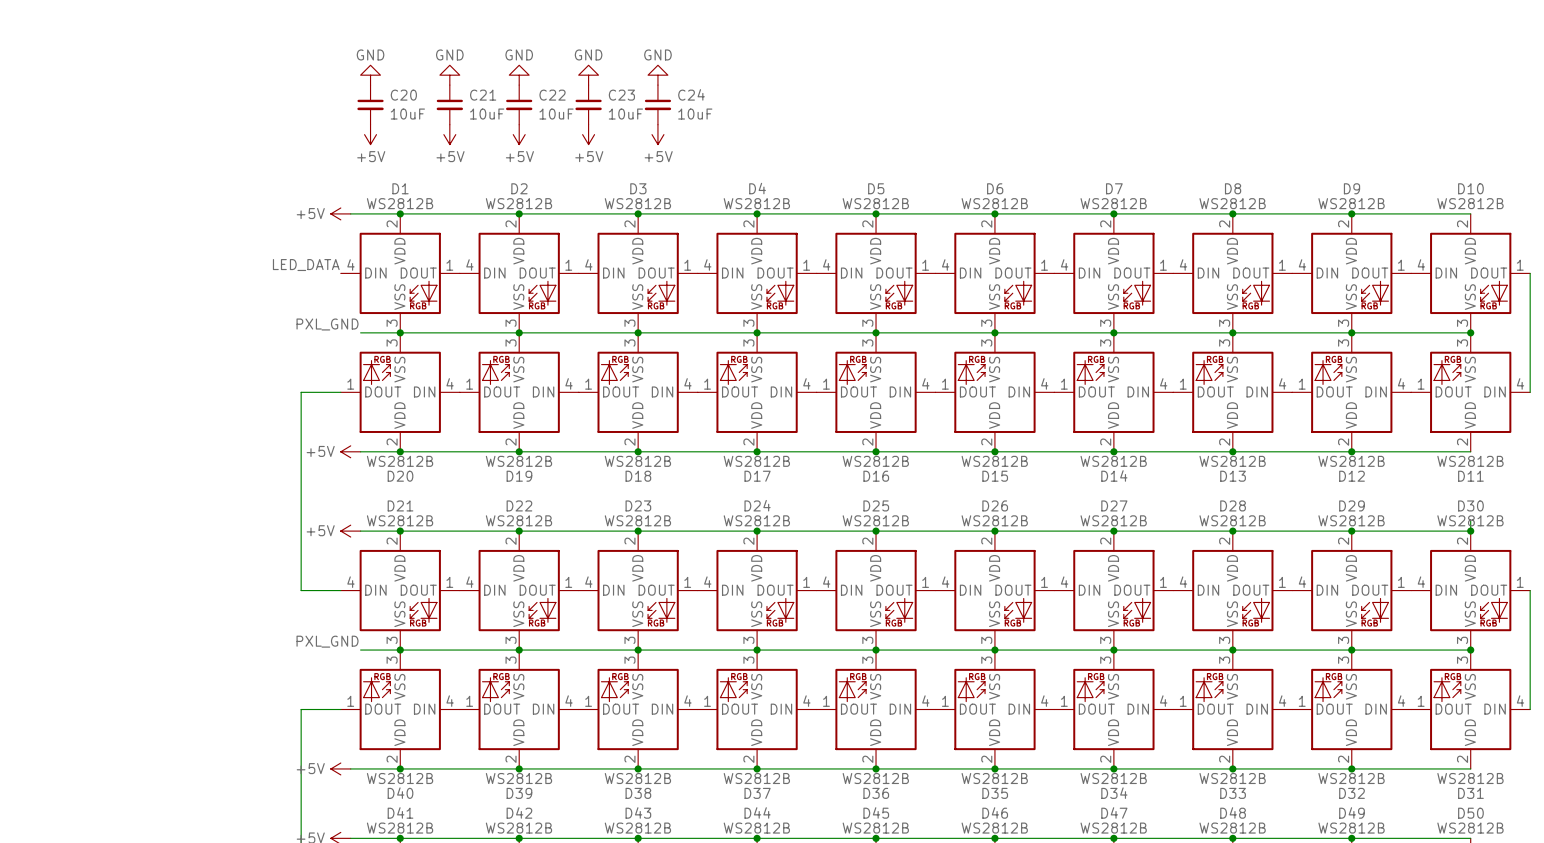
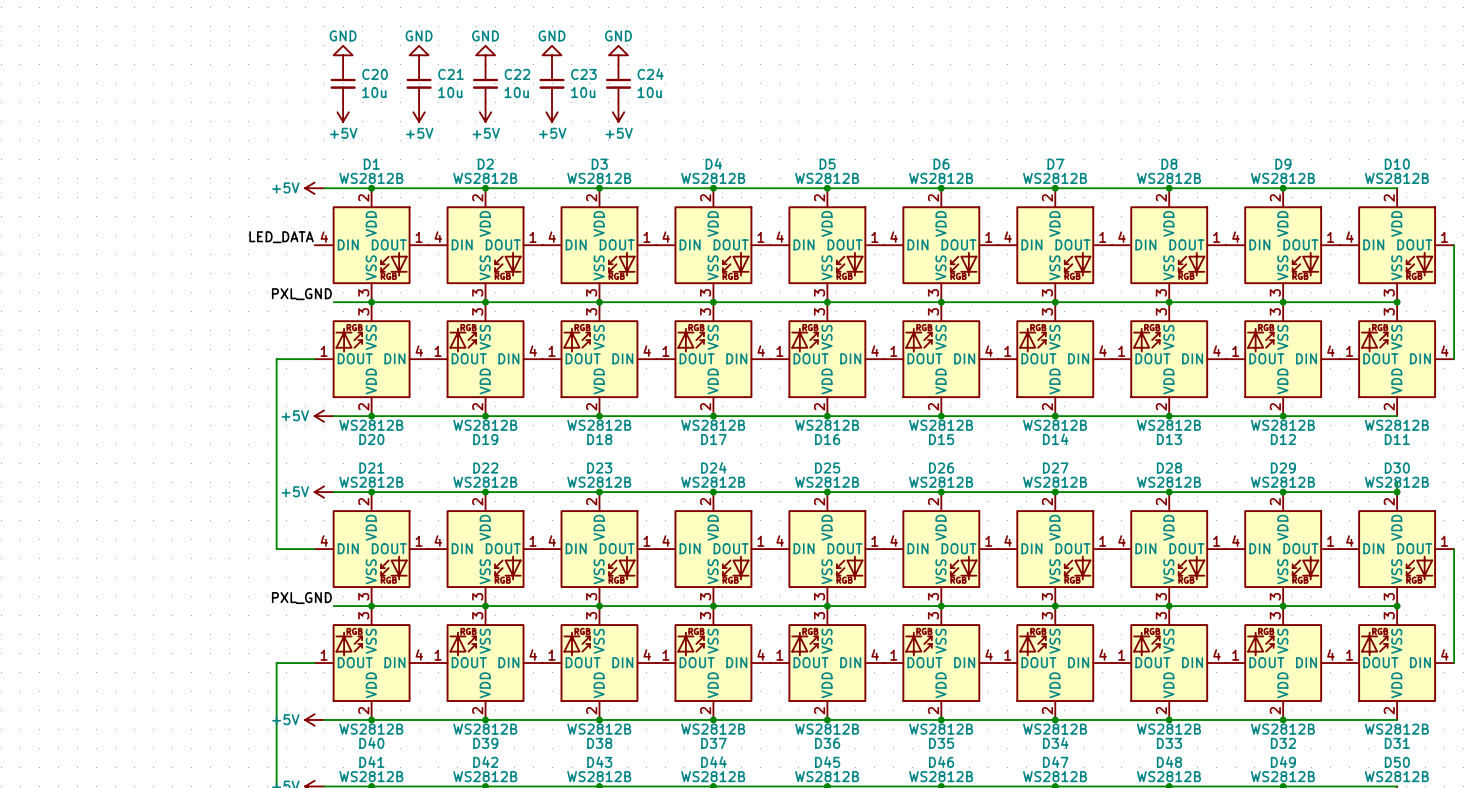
C20 value: 10uF (407, 114) -> 10u (374, 92)
C21 value: 10uF (487, 114) -> 10u (450, 92)
C22 value: 10uF (556, 114) -> 10u (516, 92)
C23 value: 10uF (625, 114) -> 10u (583, 92)
C24 value: 10uF (695, 114) -> 10u (649, 92)

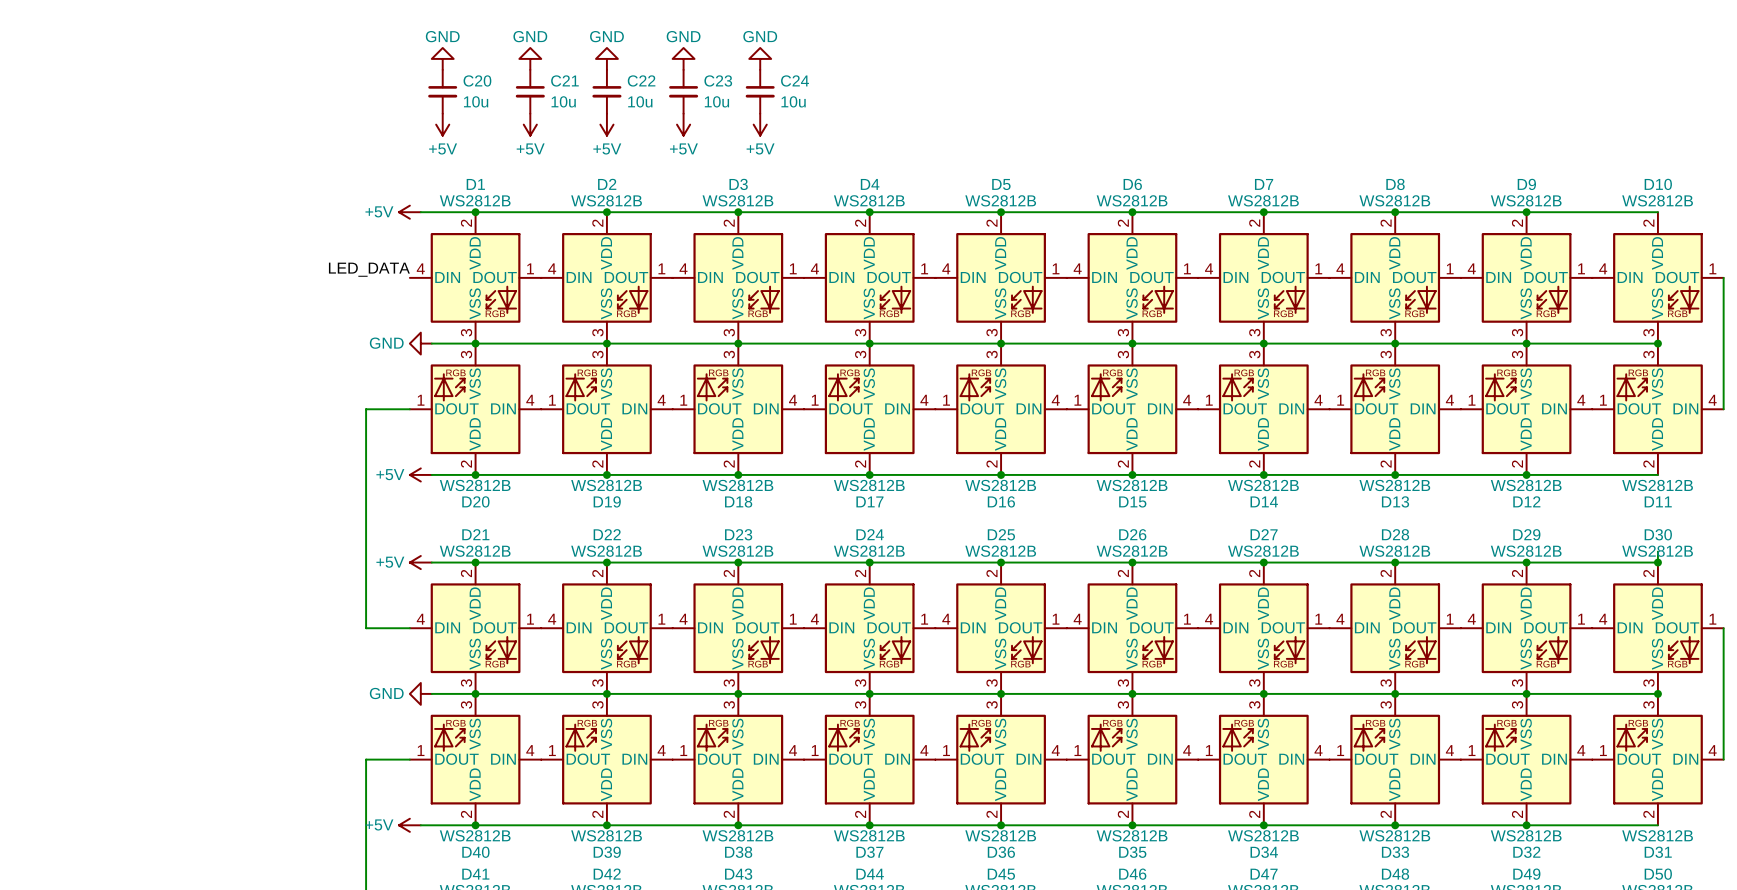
label: PXL_GND (301, 294) -> none
power symbol: none -> GND (420, 343)
label: PXL_GND (301, 598) -> none
power symbol: none -> GND (420, 693)

